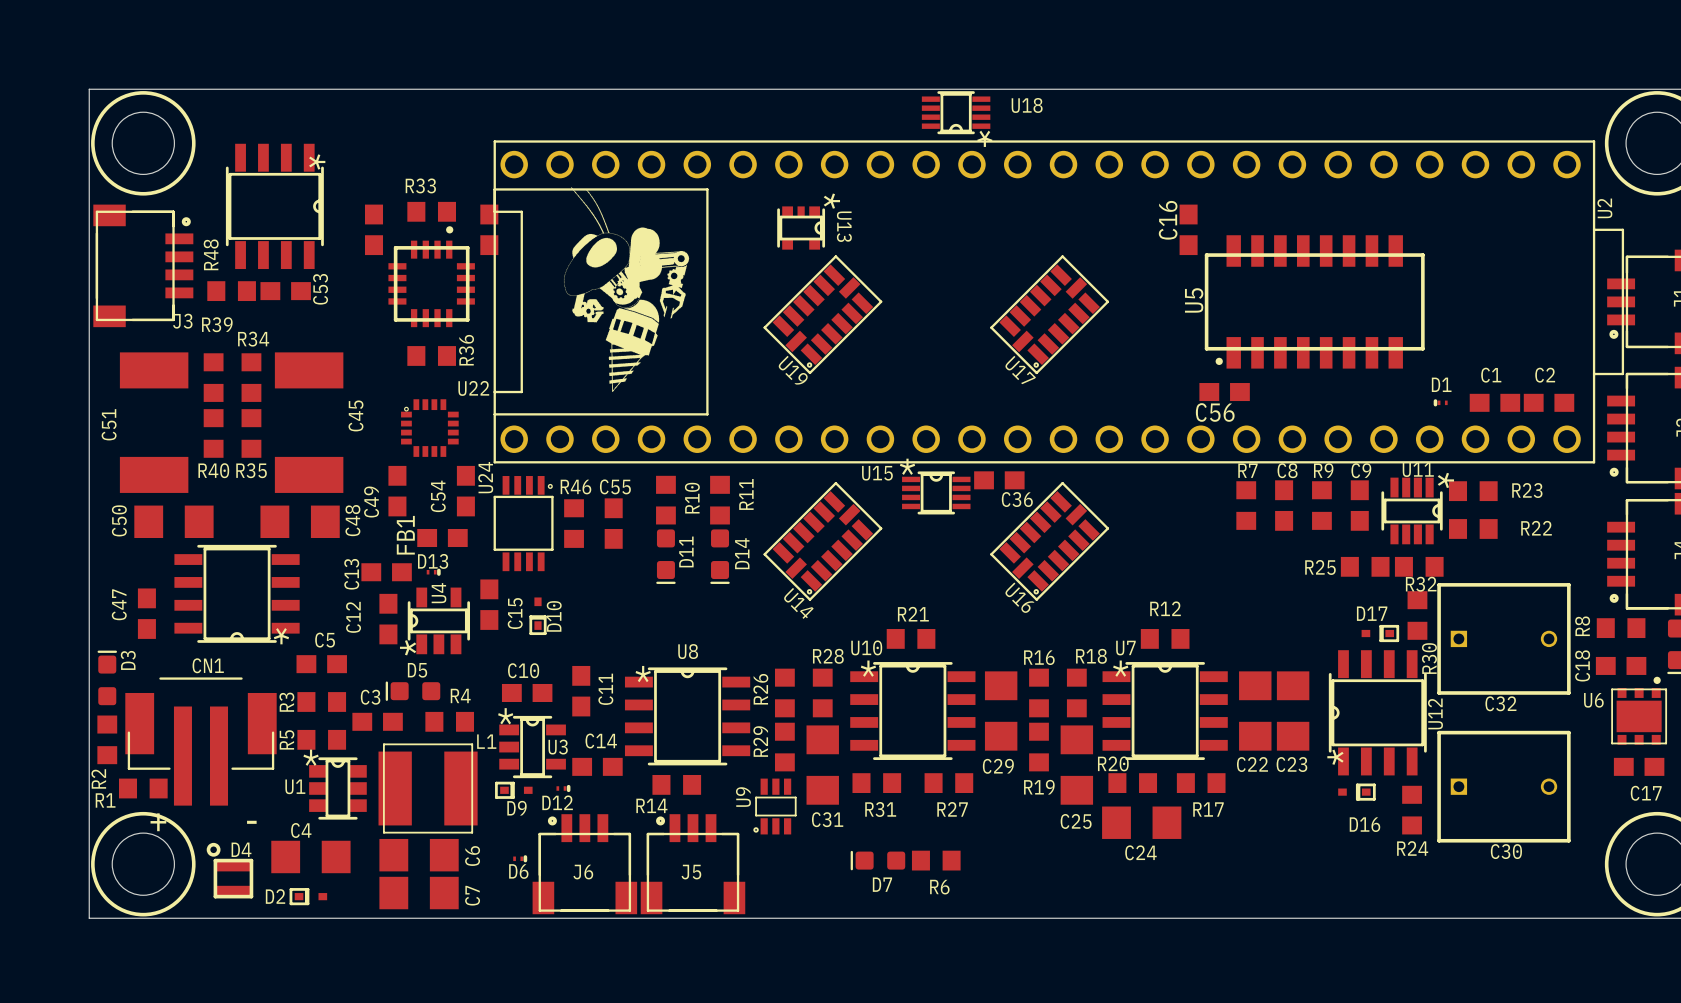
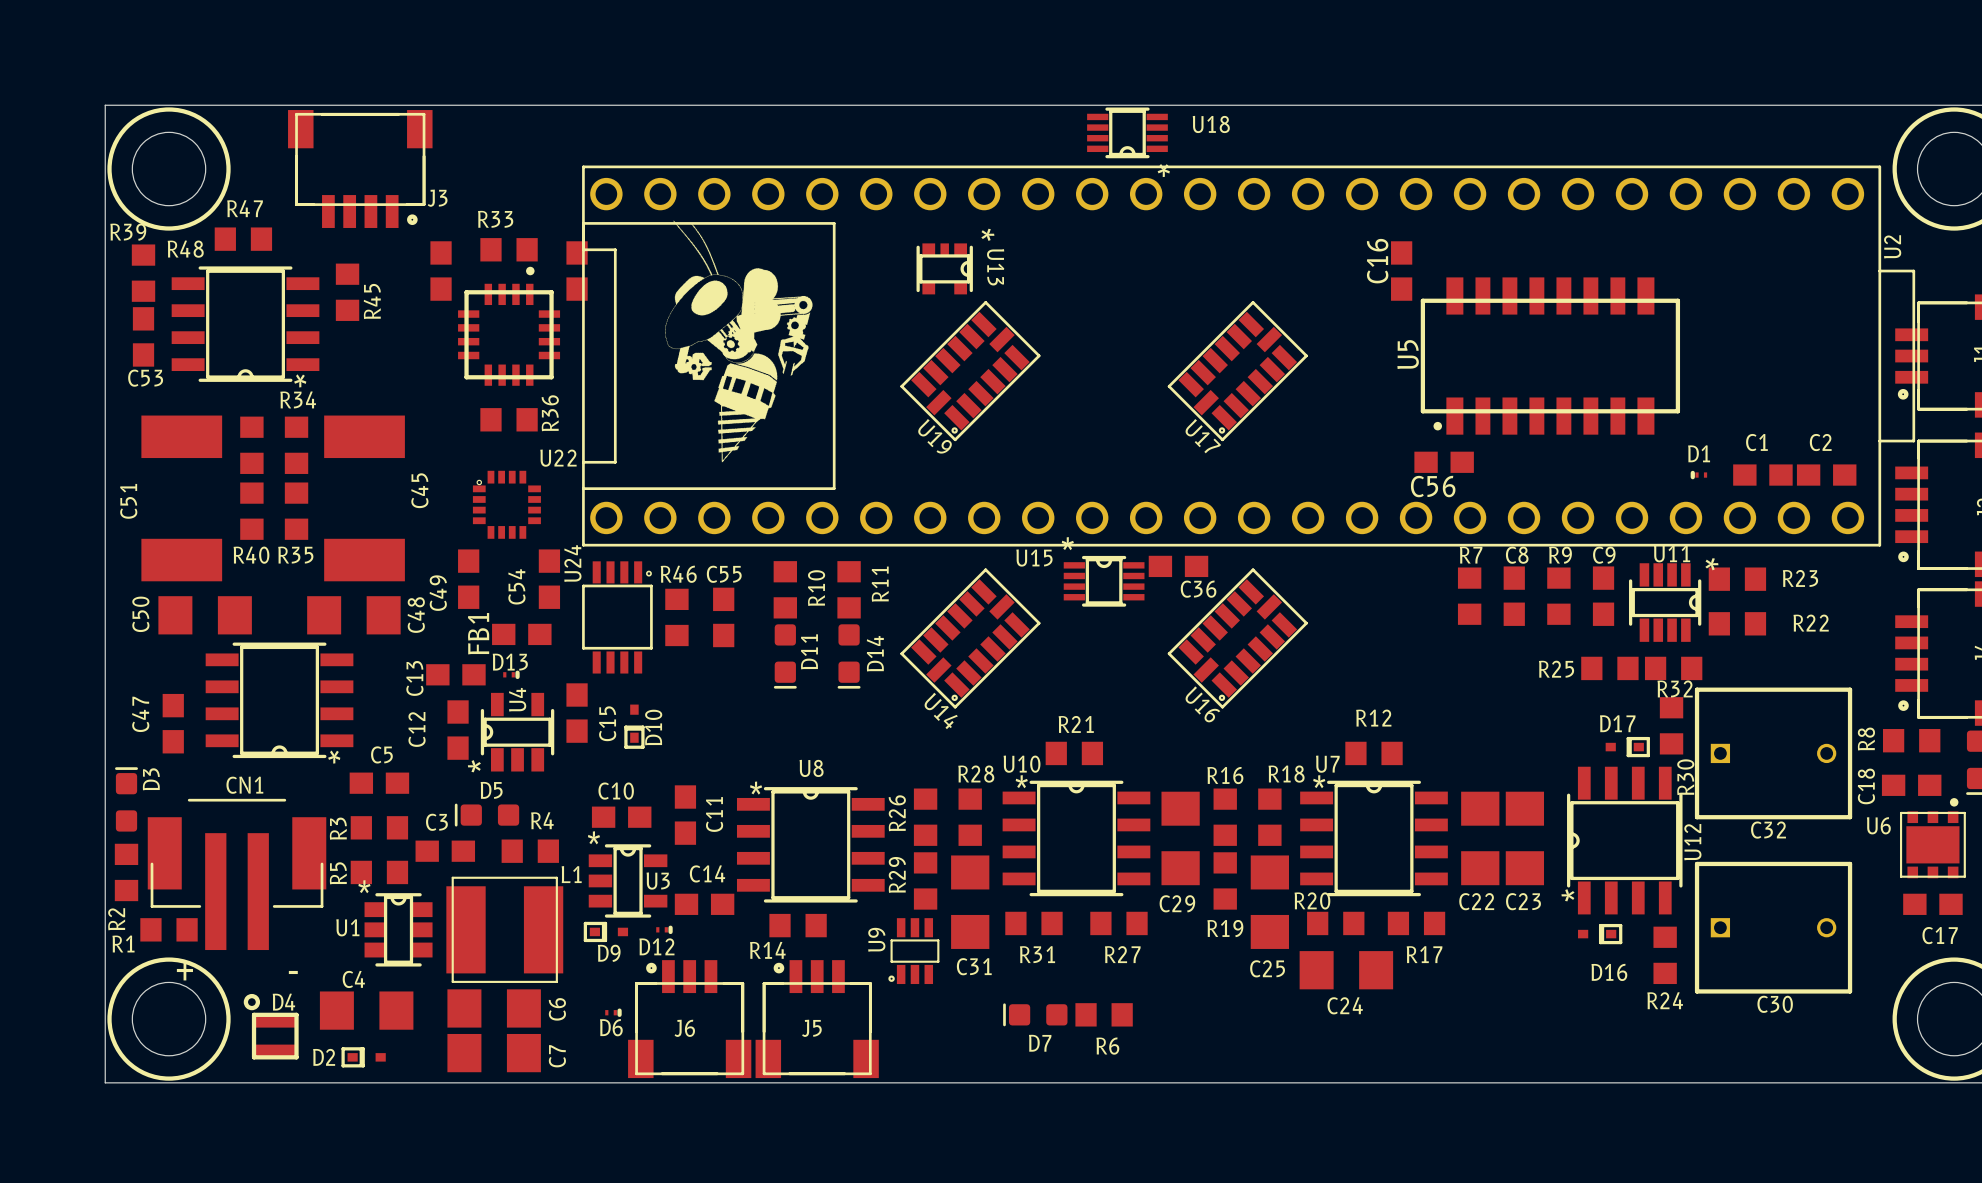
R47: none -> (243, 239)
part rotation: 0° (274, 206) -> 90° clockwise (245, 324)
part position: (274, 206) -> (245, 324)
R45: none -> (347, 292)
J3 rotation: 0° (143, 265) -> 90° clockwise (360, 169)
J3 position: (143, 265) -> (360, 169)
R48 rotation: 0° (231, 291) -> 90° clockwise (143, 273)
R48 position: (231, 291) -> (143, 273)
C53 rotation: 0° (285, 291) -> 90° clockwise (143, 336)
C53 position: (285, 291) -> (143, 336)
J3 name position: J3 (182, 321) -> J3 (437, 198)
R39 name position: R39 (217, 324) -> R39 (128, 232)

